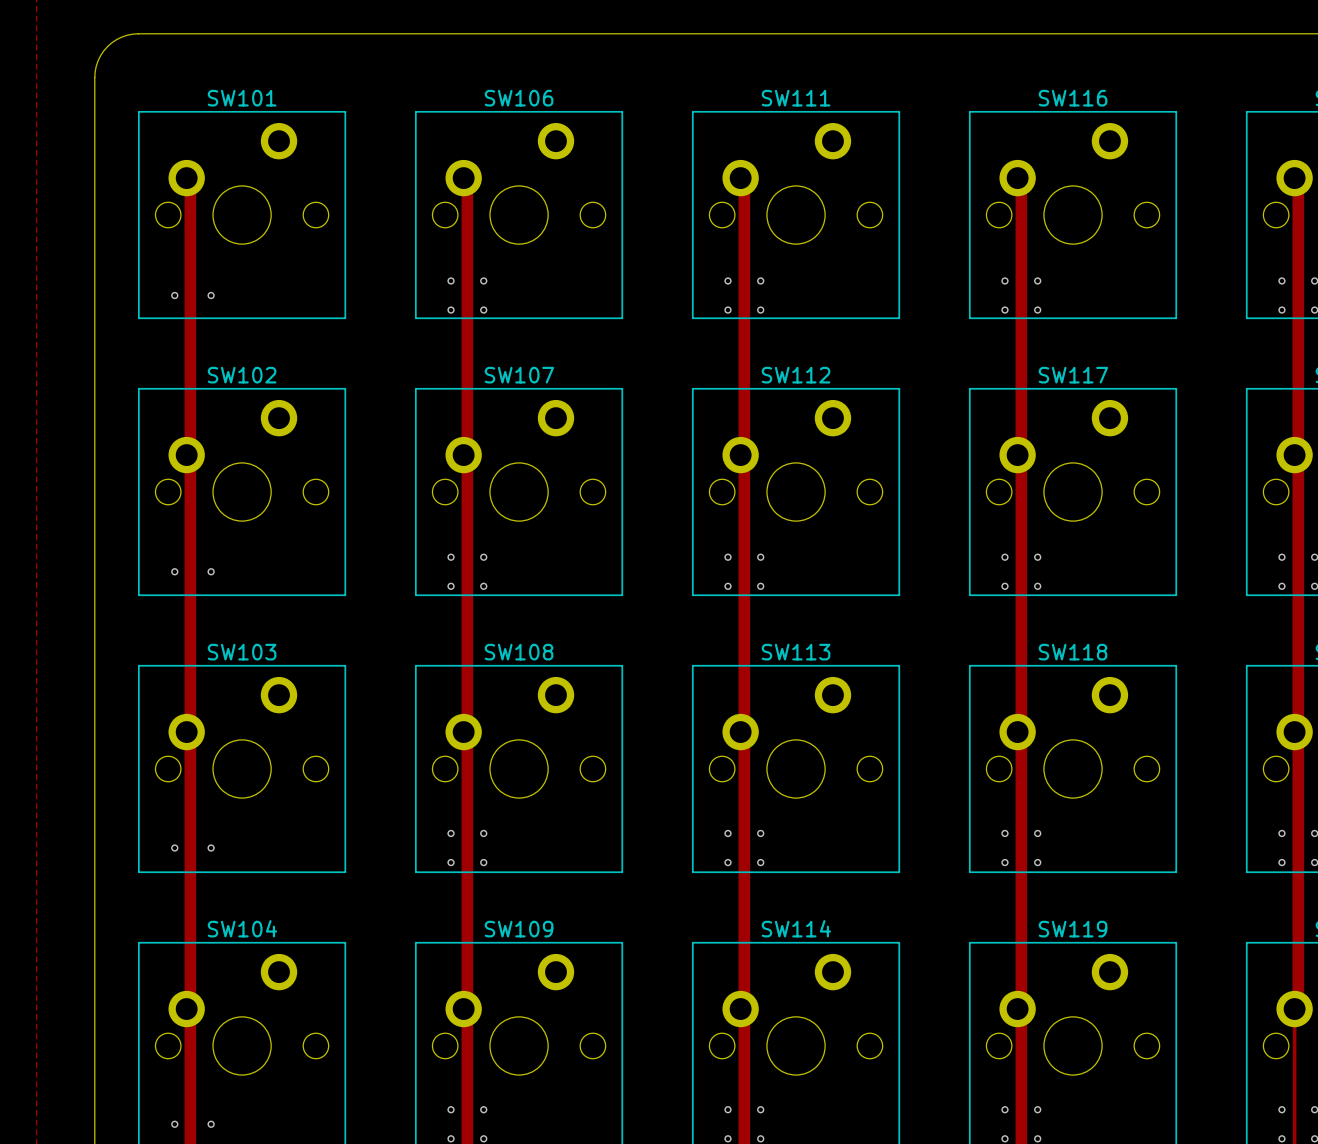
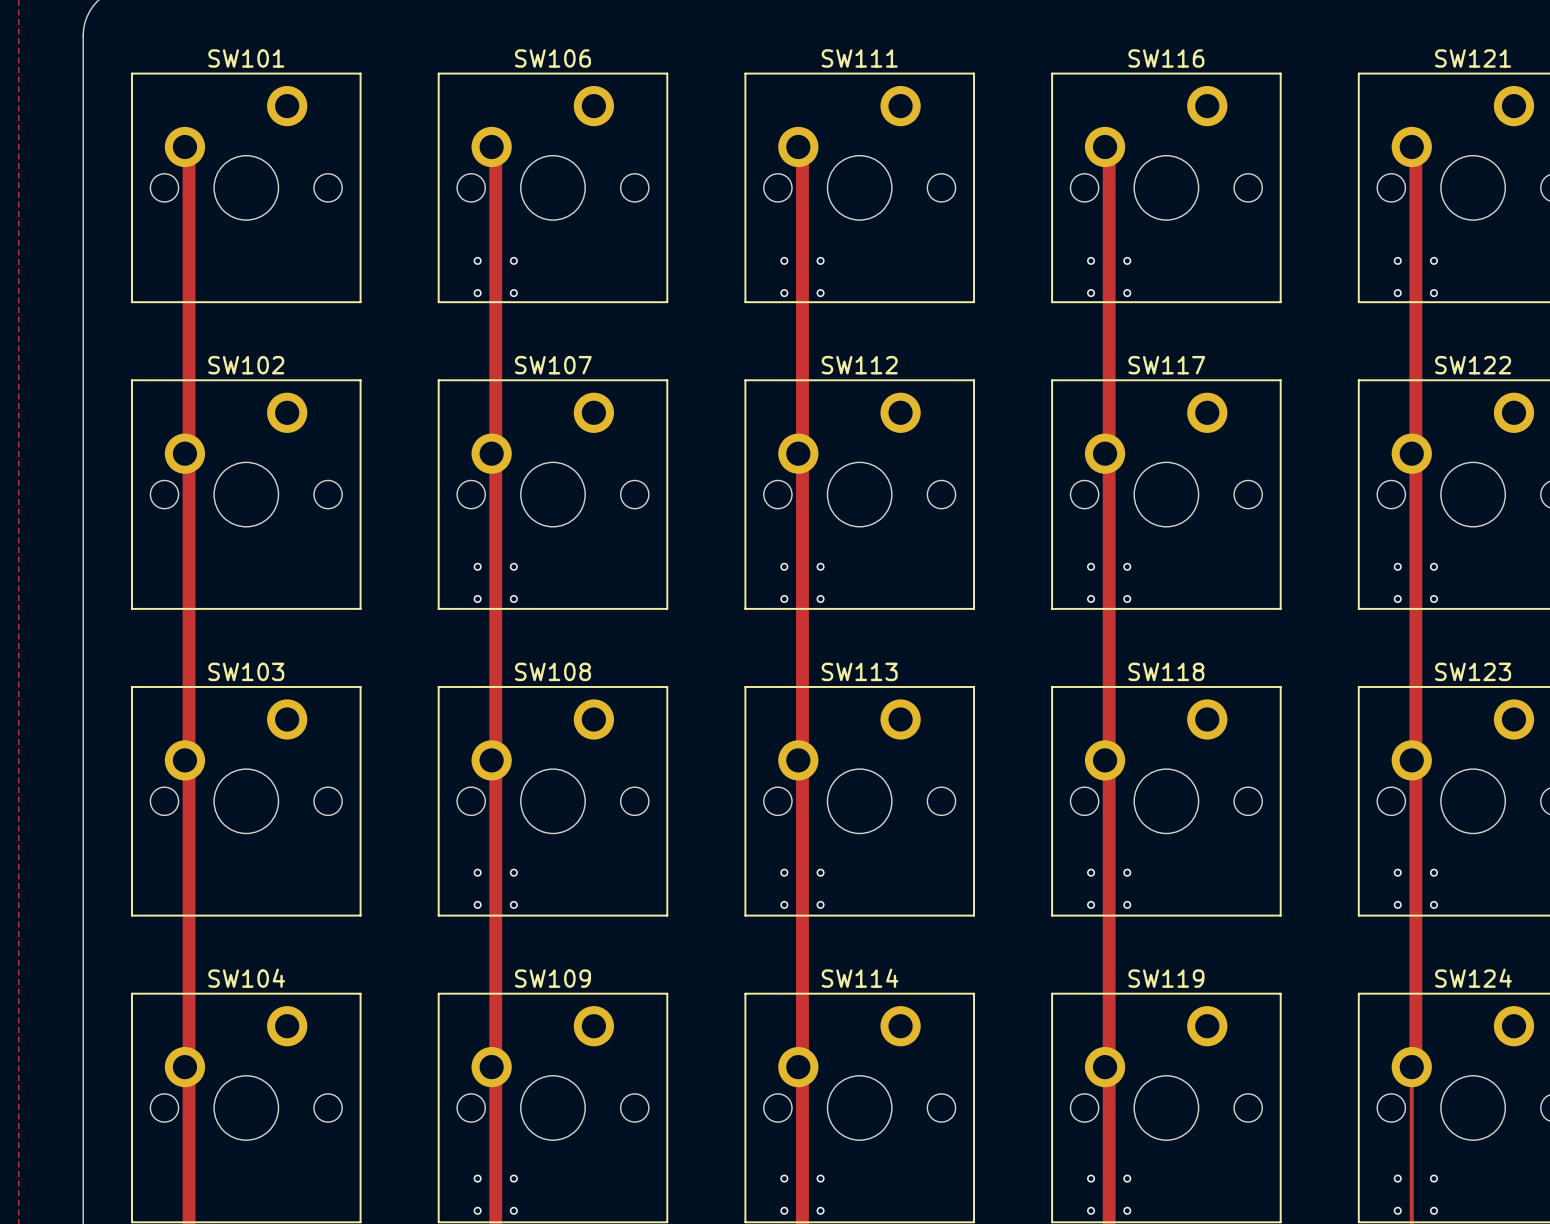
via: (174, 295) -> none
via: (211, 295) -> none
via: (174, 571) -> none
via: (211, 571) -> none
via: (174, 848) -> none
via: (211, 848) -> none
via: (174, 1124) -> none
via: (211, 1124) -> none

